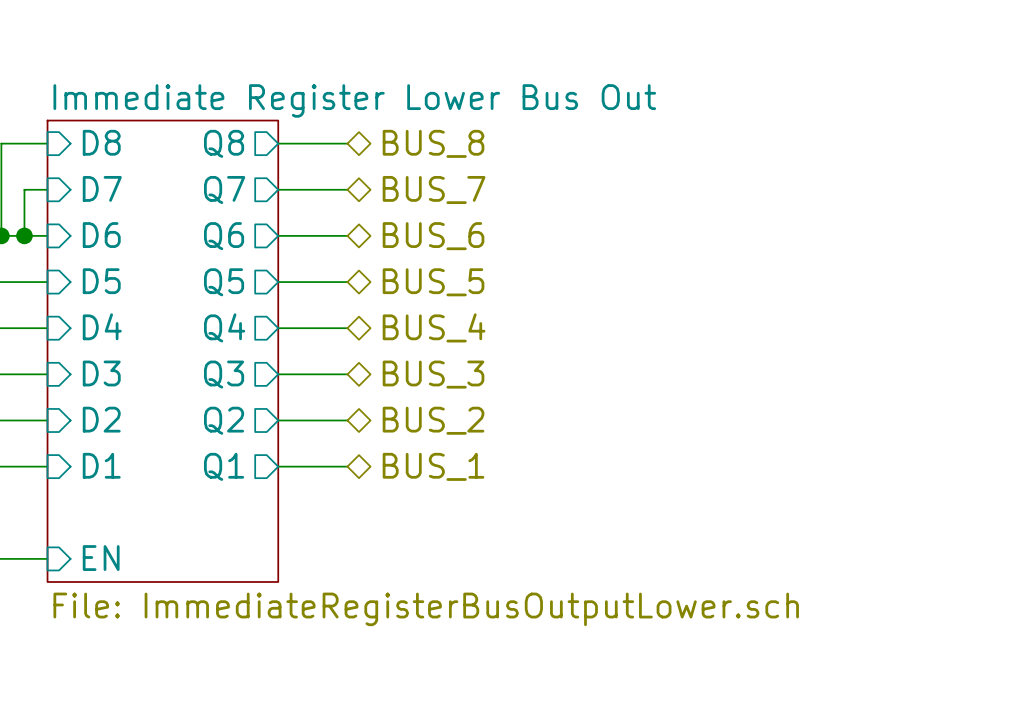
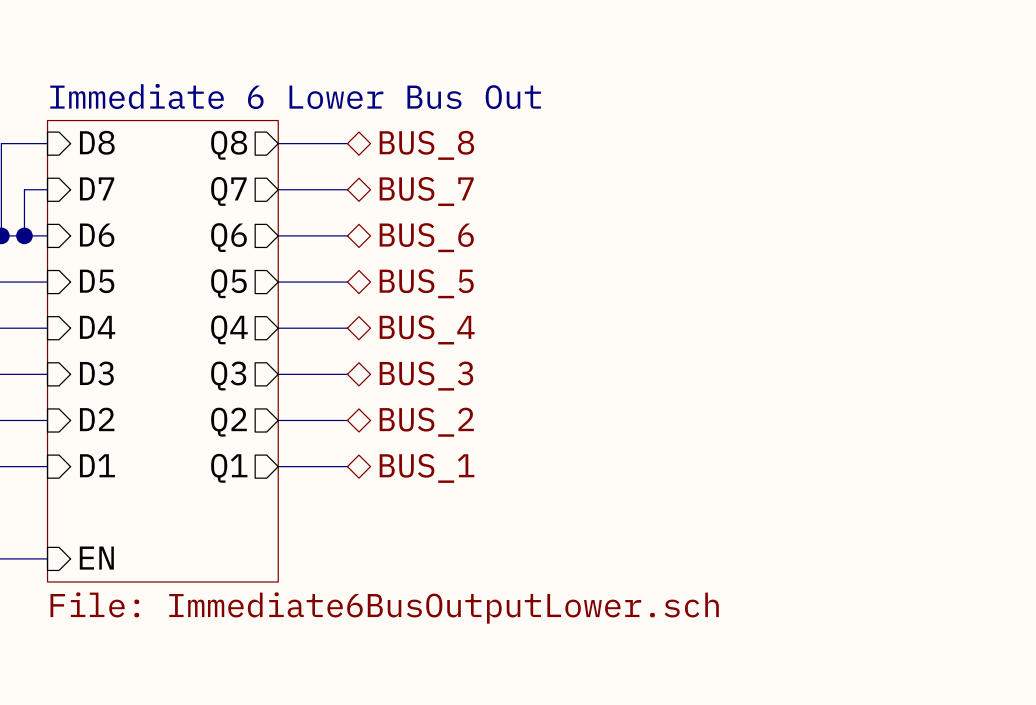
sheet Immediate Register Lower Bus Out name: Immediate Register Lower Bus Out (354, 100) -> Immediate 6 Lower Bus Out (295, 96)
sheet Immediate Register Lower Bus Out value: File: ImmediateRegisterBusOutputLower.sch (426, 609) -> File: Immediate6BusOutputLower.sch (384, 608)

